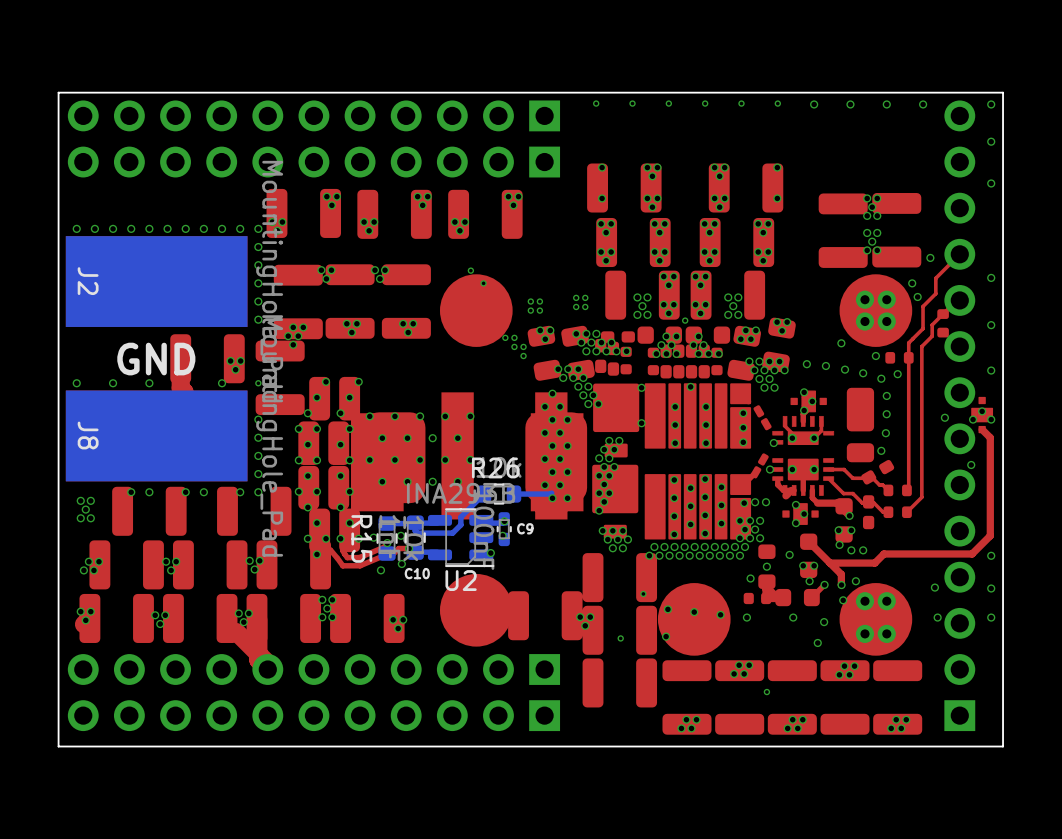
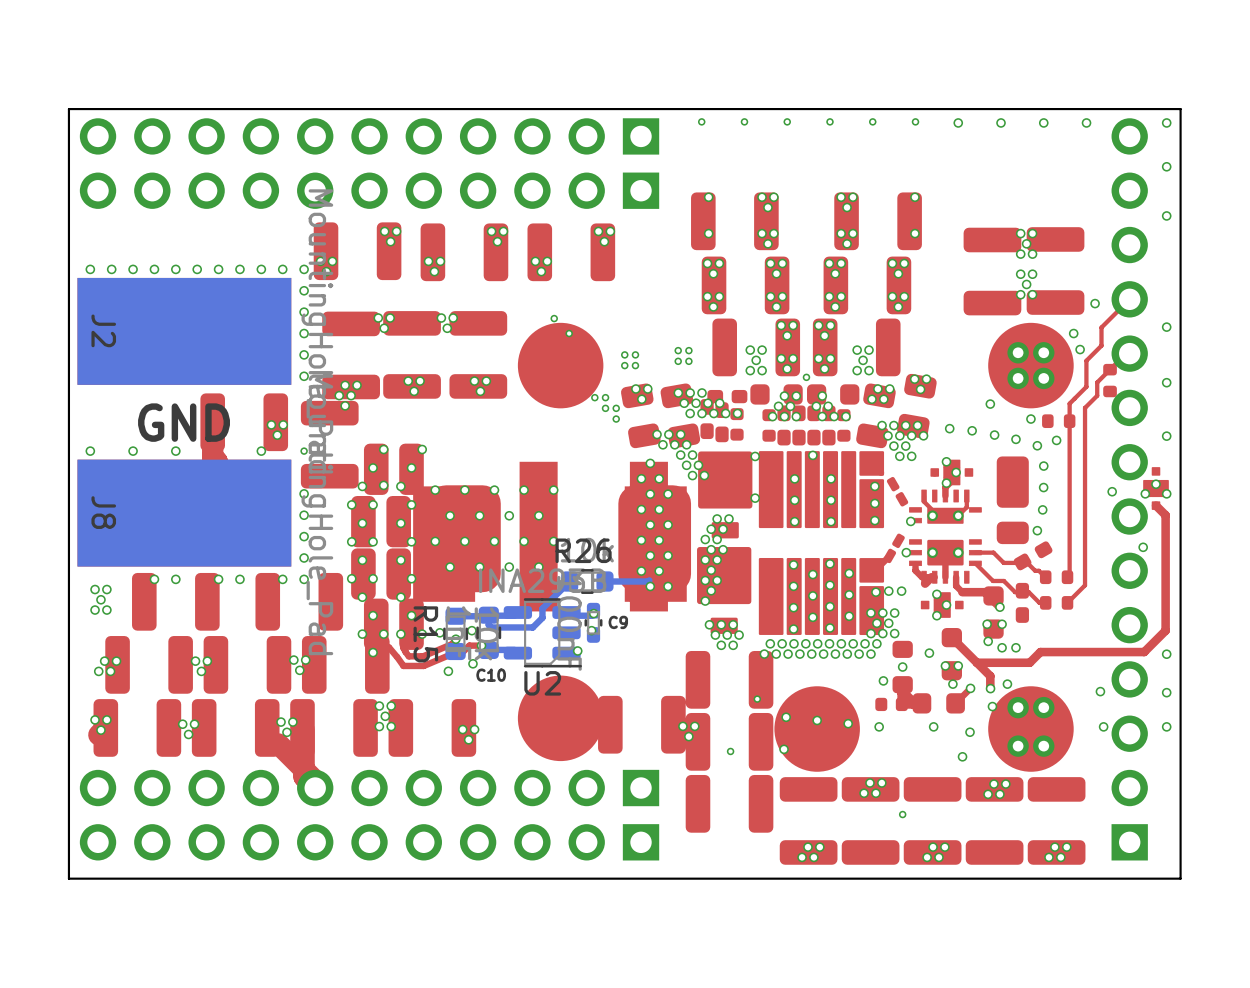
via: none -> (383, 485)

